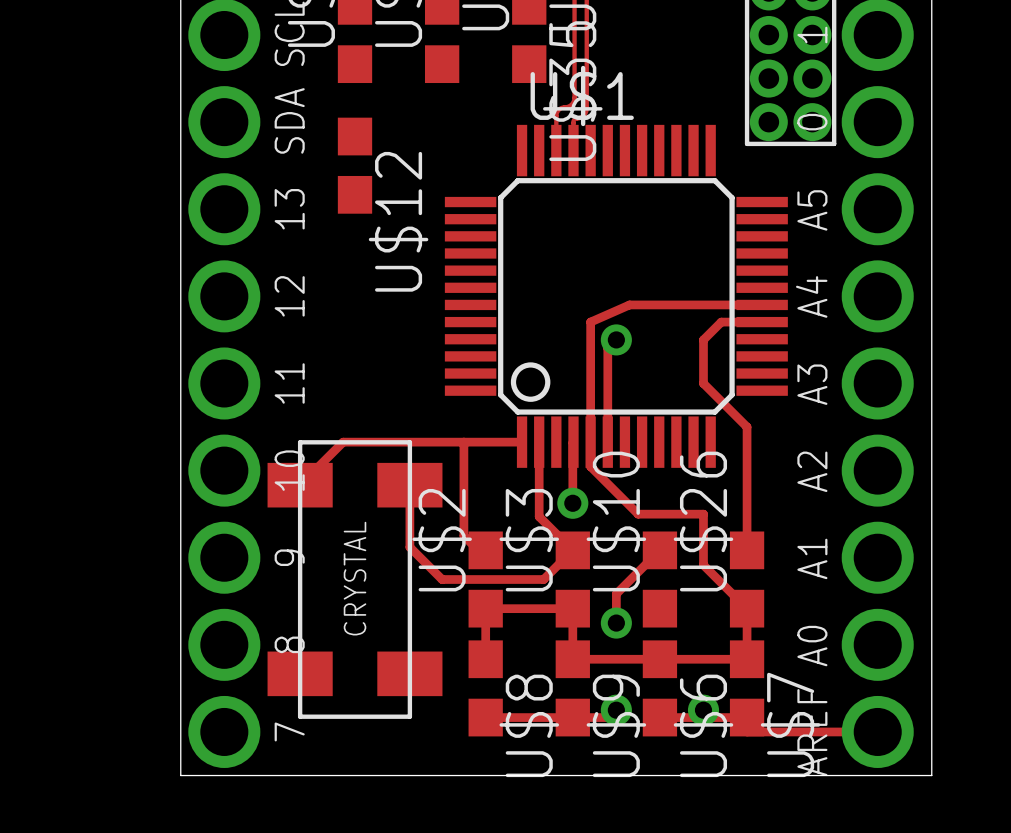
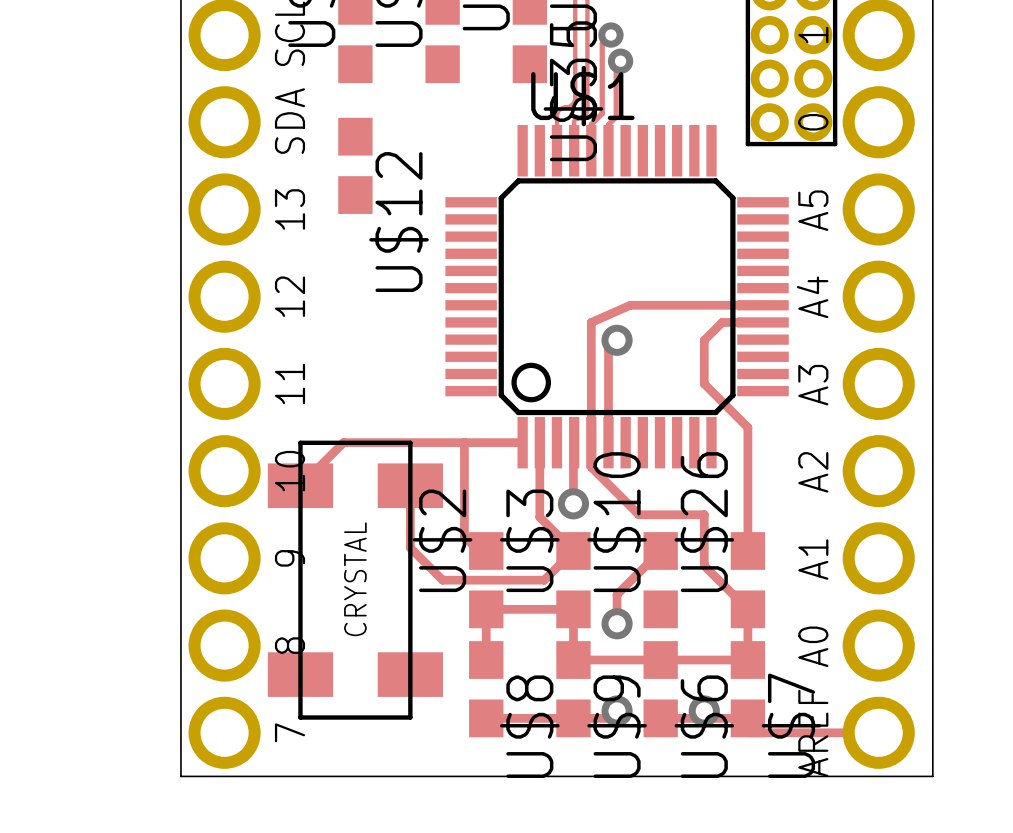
track: none -> (610, 35) (602, 43) (602, 113) (591, 124) (591, 150)
via: none -> (610, 35)
track: none -> (620, 61) (616, 65) (616, 117) (608, 124) (608, 150)
via: none -> (620, 61)

